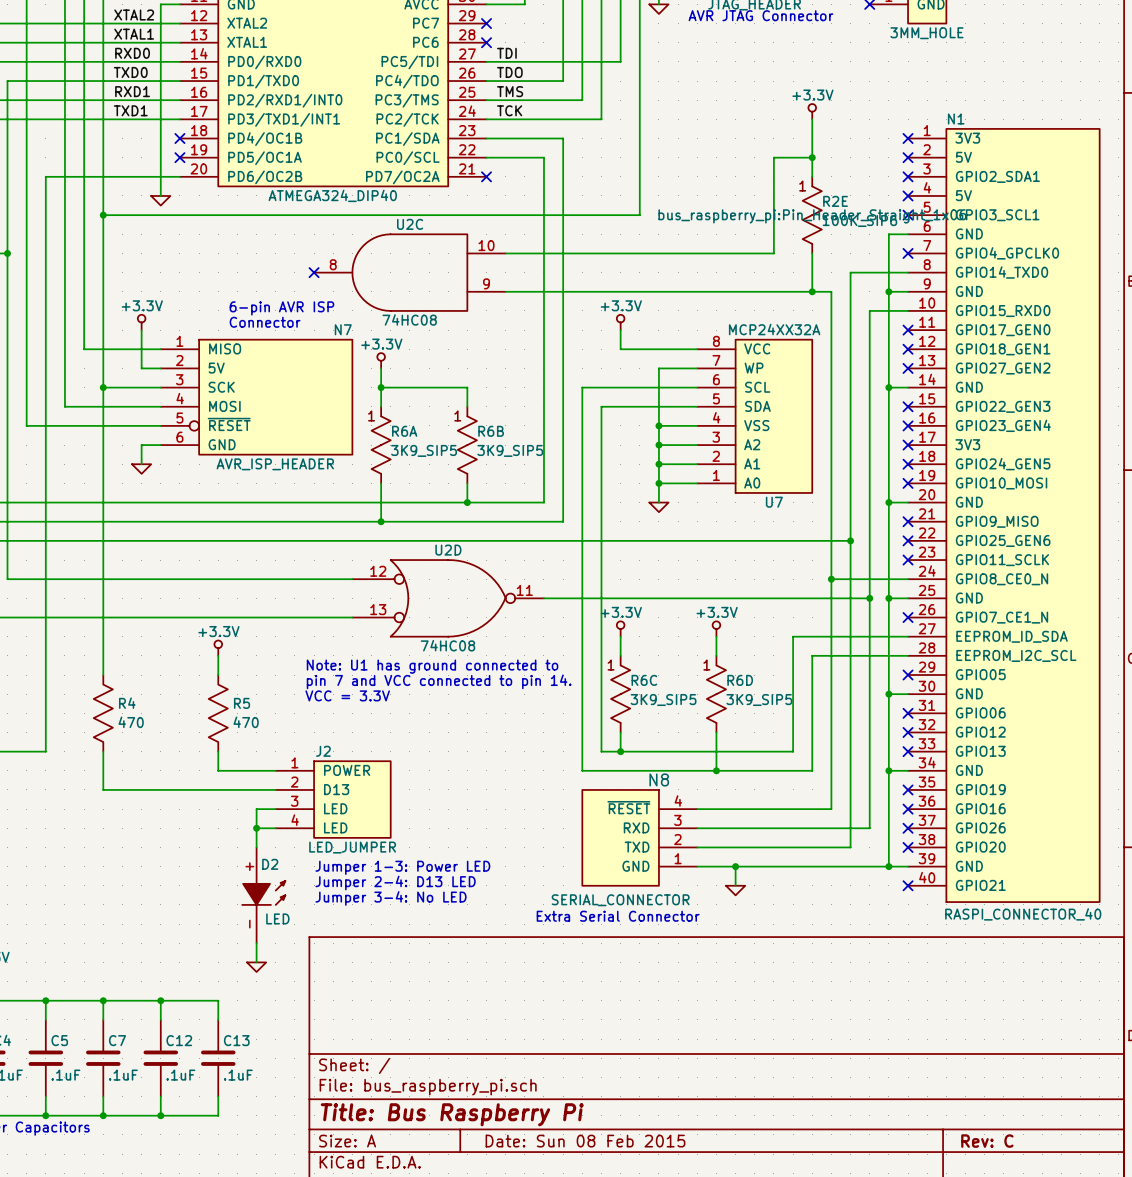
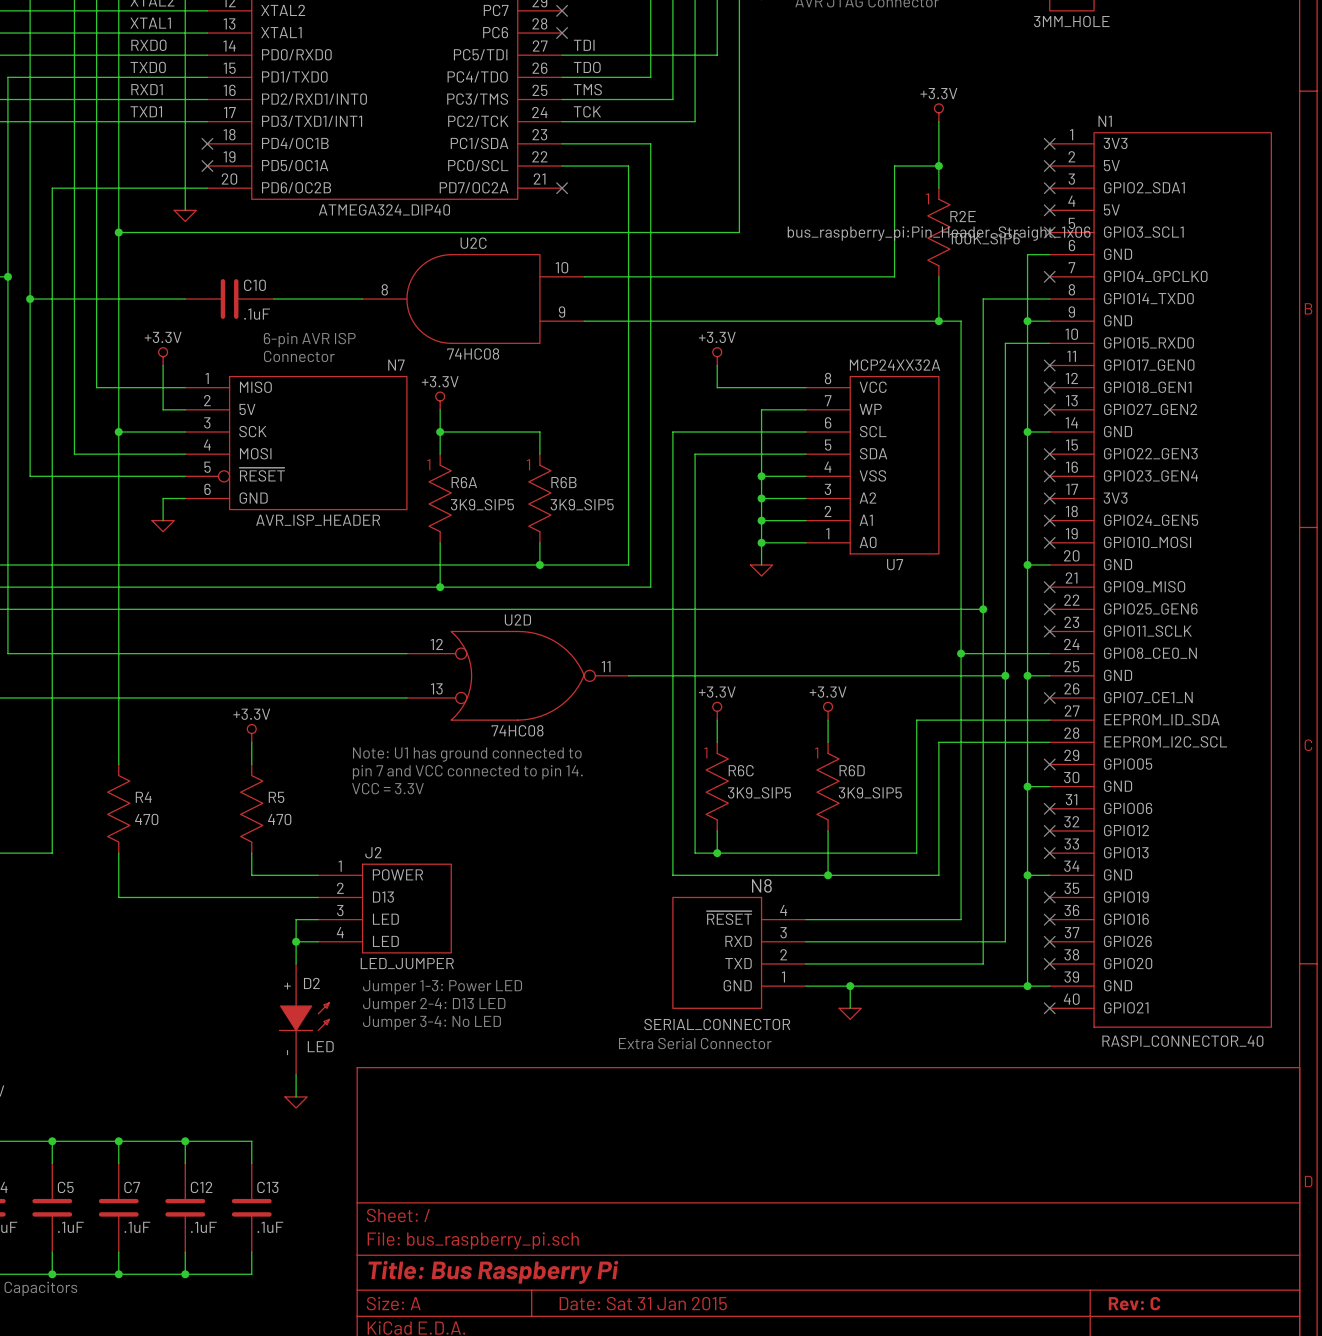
wire: none -> (30, 299) (185, 299)
junction: none -> (30, 299)
C10: none -> .1uF (229, 299)
wire: none -> (273, 299) (362, 299)
no-connect mark: (314, 272) -> none
title block: Date: Sun 08 Feb 2015 (585, 1141) -> Date: Sat 31 Jan 2015 (643, 1303)

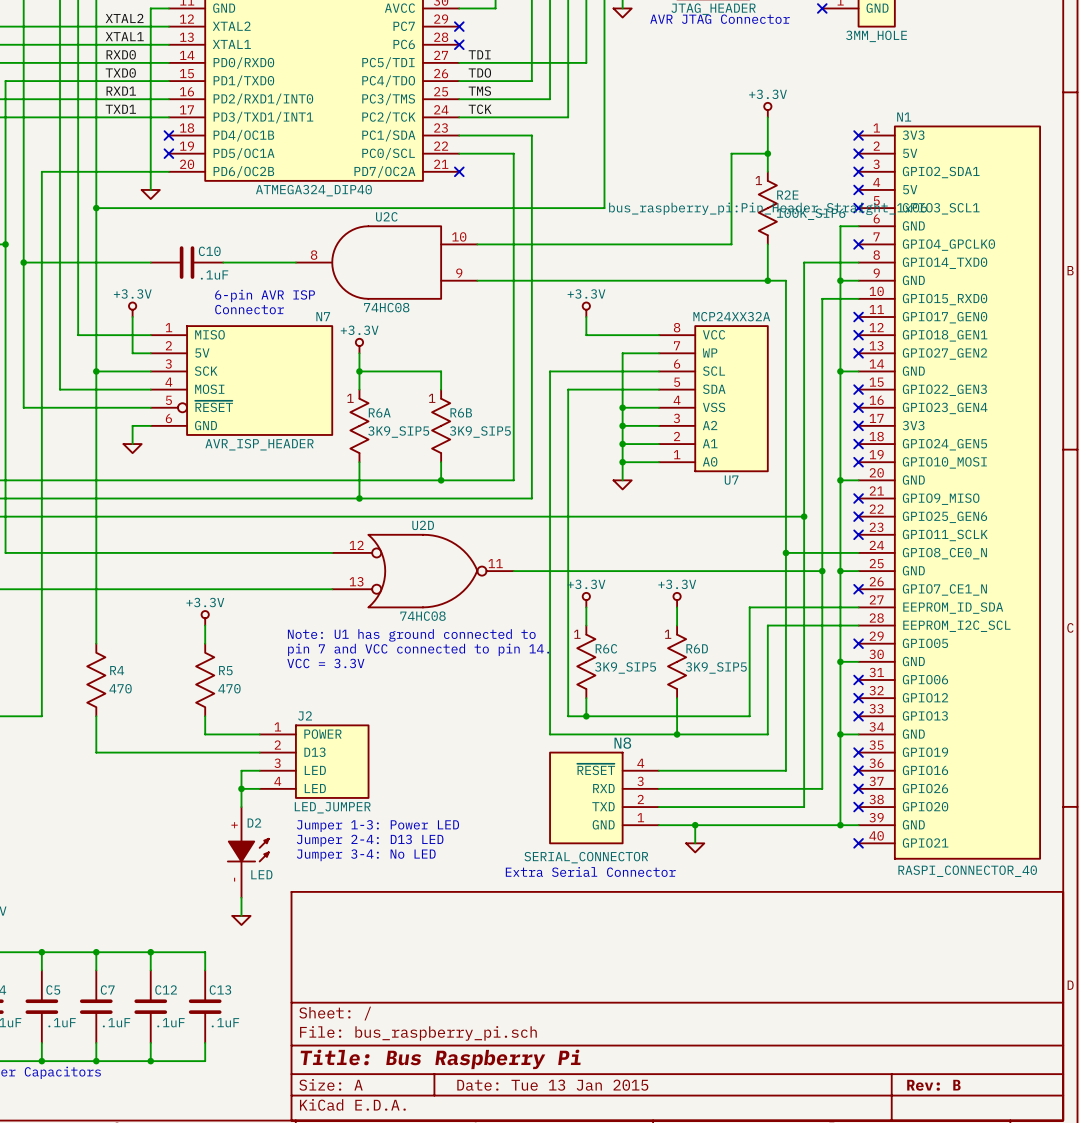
title block: Date: Sat 31 Jan 2015 (643, 1303) -> Date: Tue 13 Jan 2015 (552, 1085)
title block: Rev: C (1134, 1303) -> Rev: B (933, 1085)

